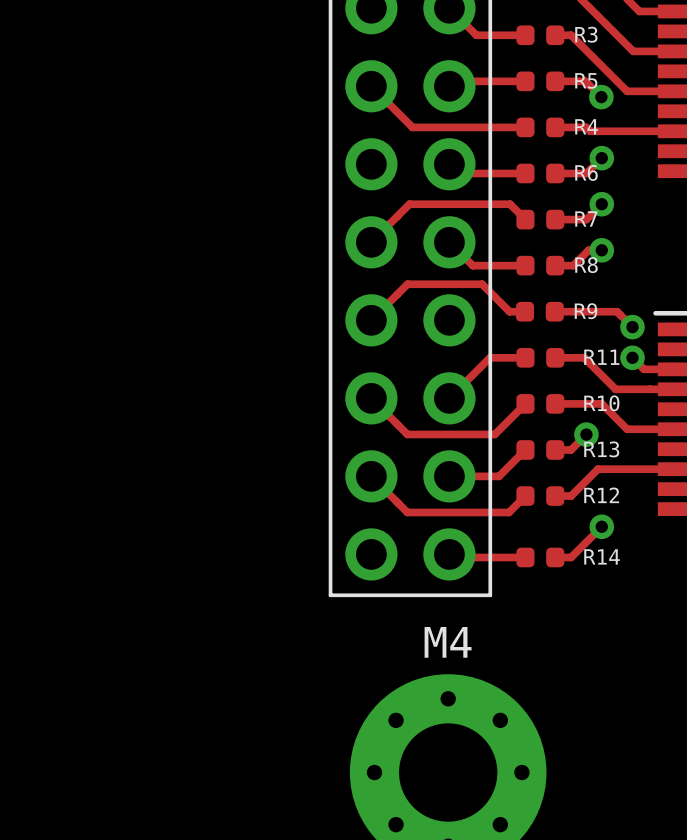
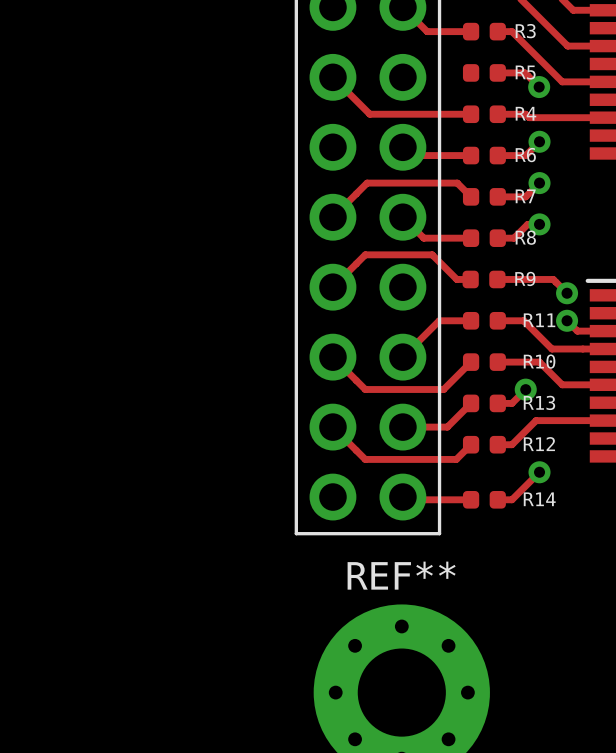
top track: (525, 81) (454, 81) (449, 86) -> none
M4 name: M4 (448, 642) -> REF** (401, 575)

